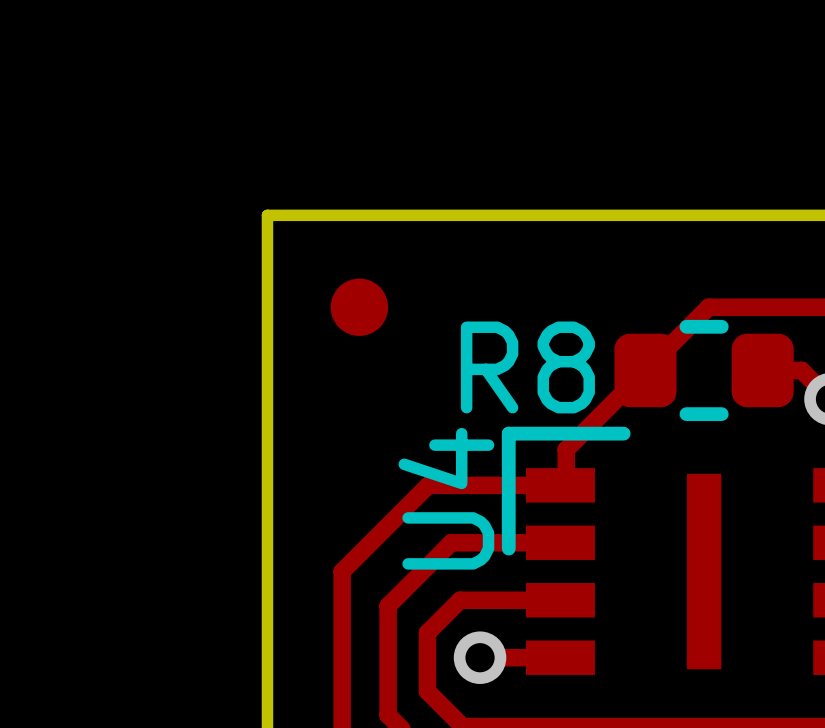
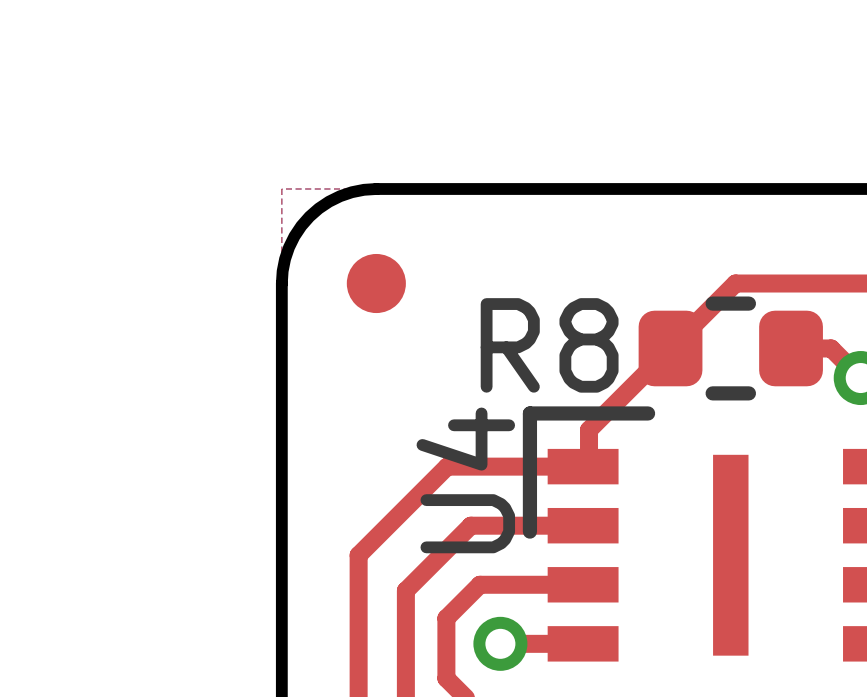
board edge: (359, 215) (267, 215) (267, 307) -> (376, 188) (351, 192) (340, 196) (318, 208) (309, 216) (301, 225) (289, 247) (285, 259) (281, 283)

